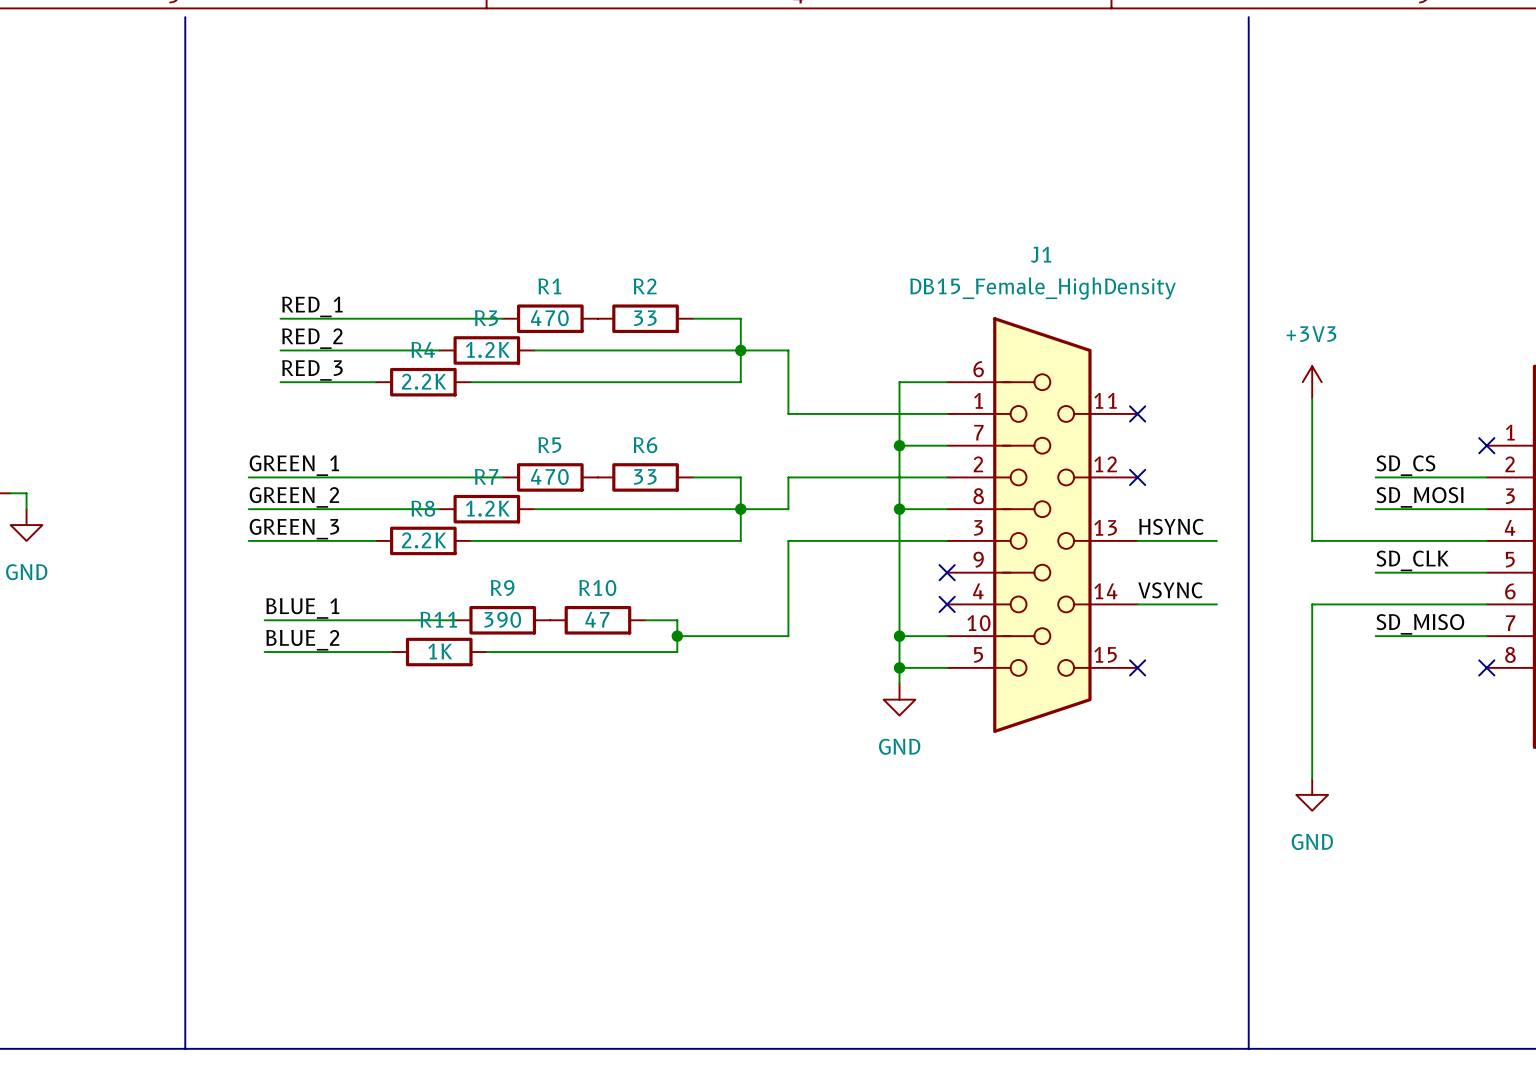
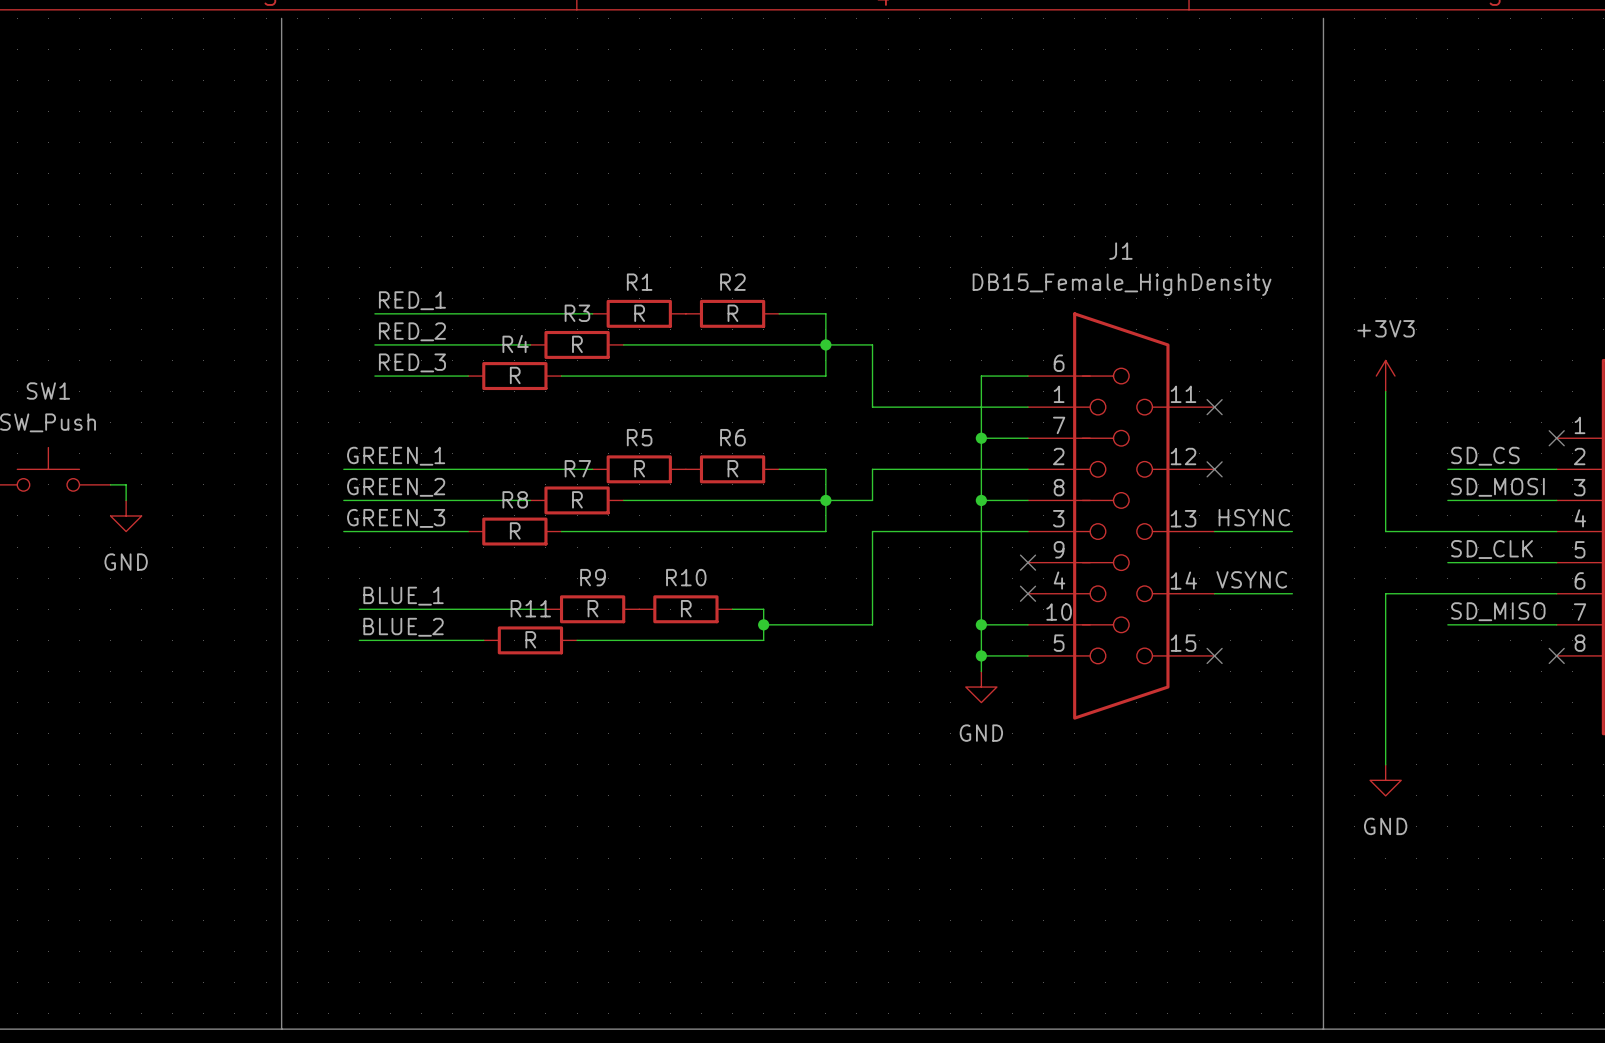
R1 value: 470 (549, 318) -> R (639, 313)
R2 value: 33 (645, 318) -> R (732, 313)
R3 value: 1.2K (487, 349) -> R (577, 344)
R4 value: 2.2K (424, 381) -> R (515, 375)
R5 value: 470 (549, 476) -> R (639, 468)
R6 value: 33 (645, 476) -> R (732, 468)
R7 value: 1.2K (487, 508) -> R (577, 499)
R8 value: 2.2K (424, 540) -> R (515, 530)
R9 value: 390 (502, 619) -> R (592, 608)
R10 value: 47 (597, 619) -> R (686, 608)
R11 value: 1K (440, 651) -> R (530, 639)

